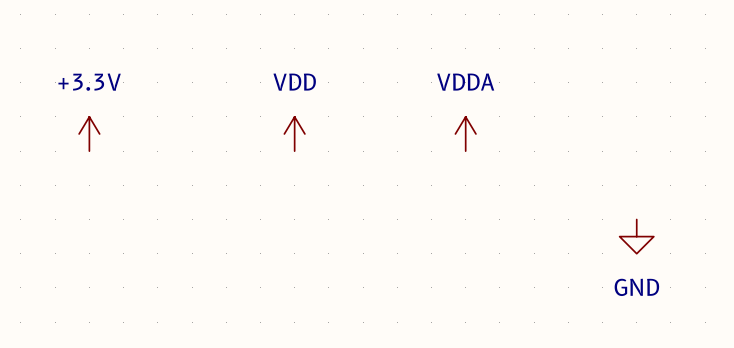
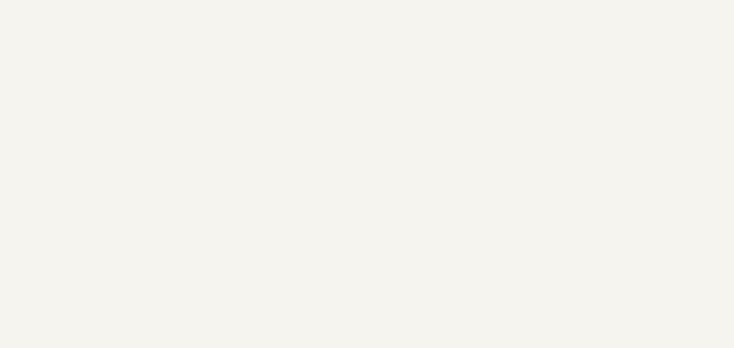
power symbol: +3.3V (89, 133) -> none
power symbol: VDD (294, 133) -> none
power symbol: VDDA (465, 133) -> none
power symbol: GND (636, 236) -> none

